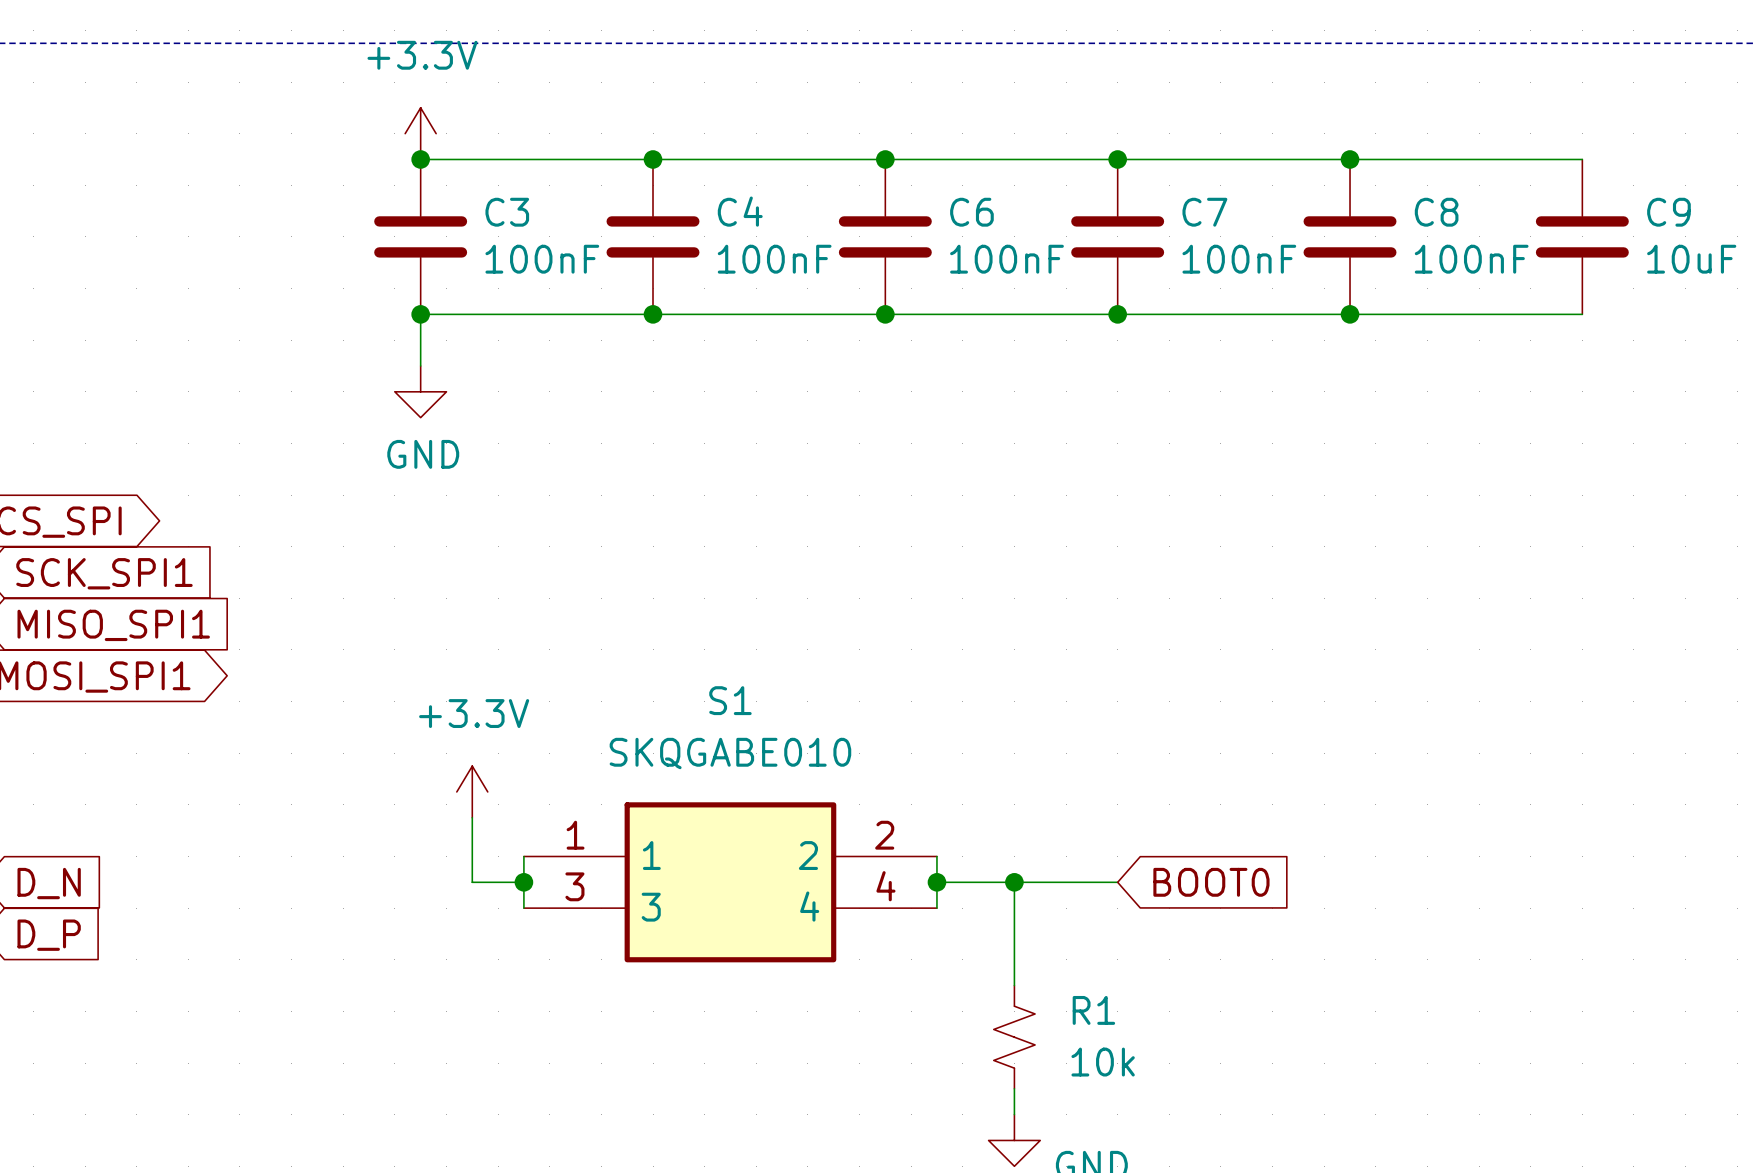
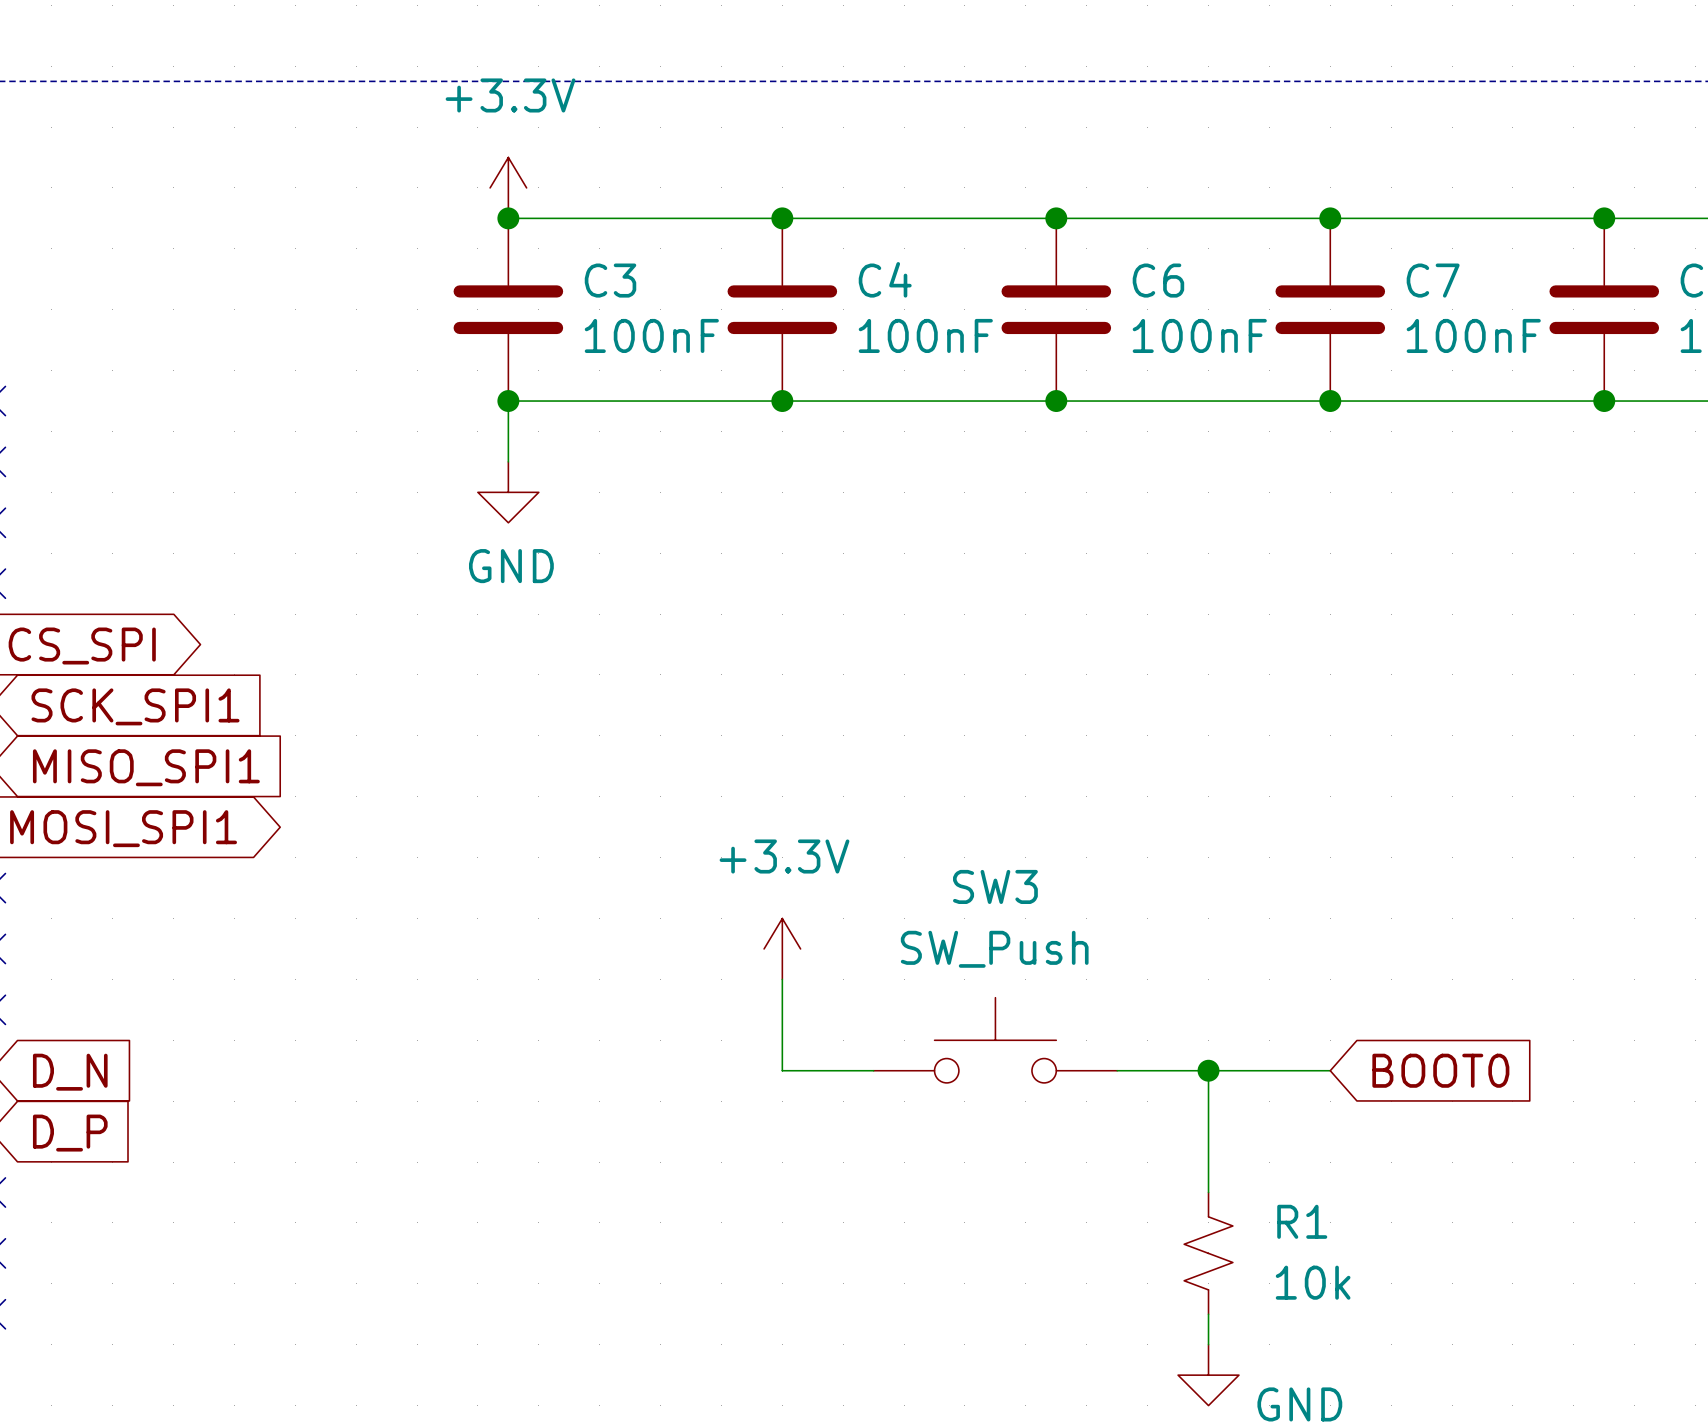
power symbol position: +3.3V (472, 791) -> +3.3V (782, 948)
wire: (472, 817) (472, 882) (523, 882) -> none
wire: (523, 856) (523, 908) -> none
SW3: none -> SW_Push (995, 1040)
wire: (936, 856) (936, 908) -> none
junction: (523, 882) -> none
S1: SKQGABE010 (730, 882) -> none
junction: (936, 882) -> none

